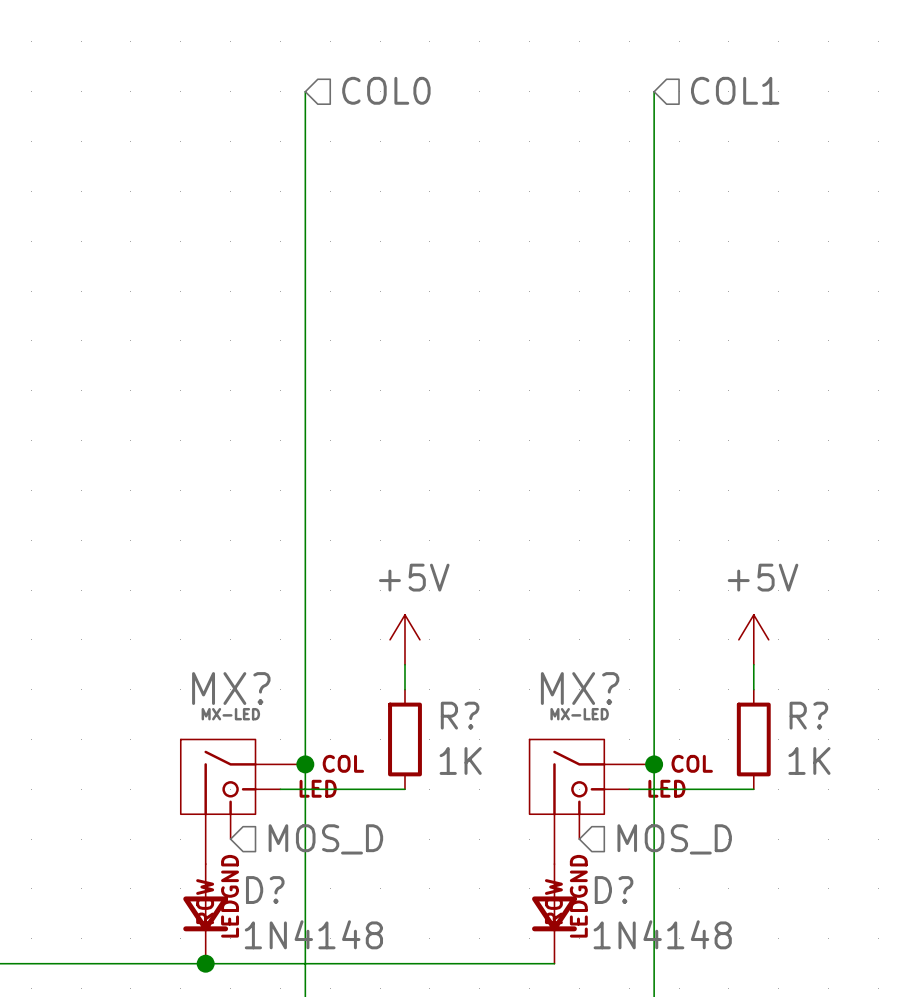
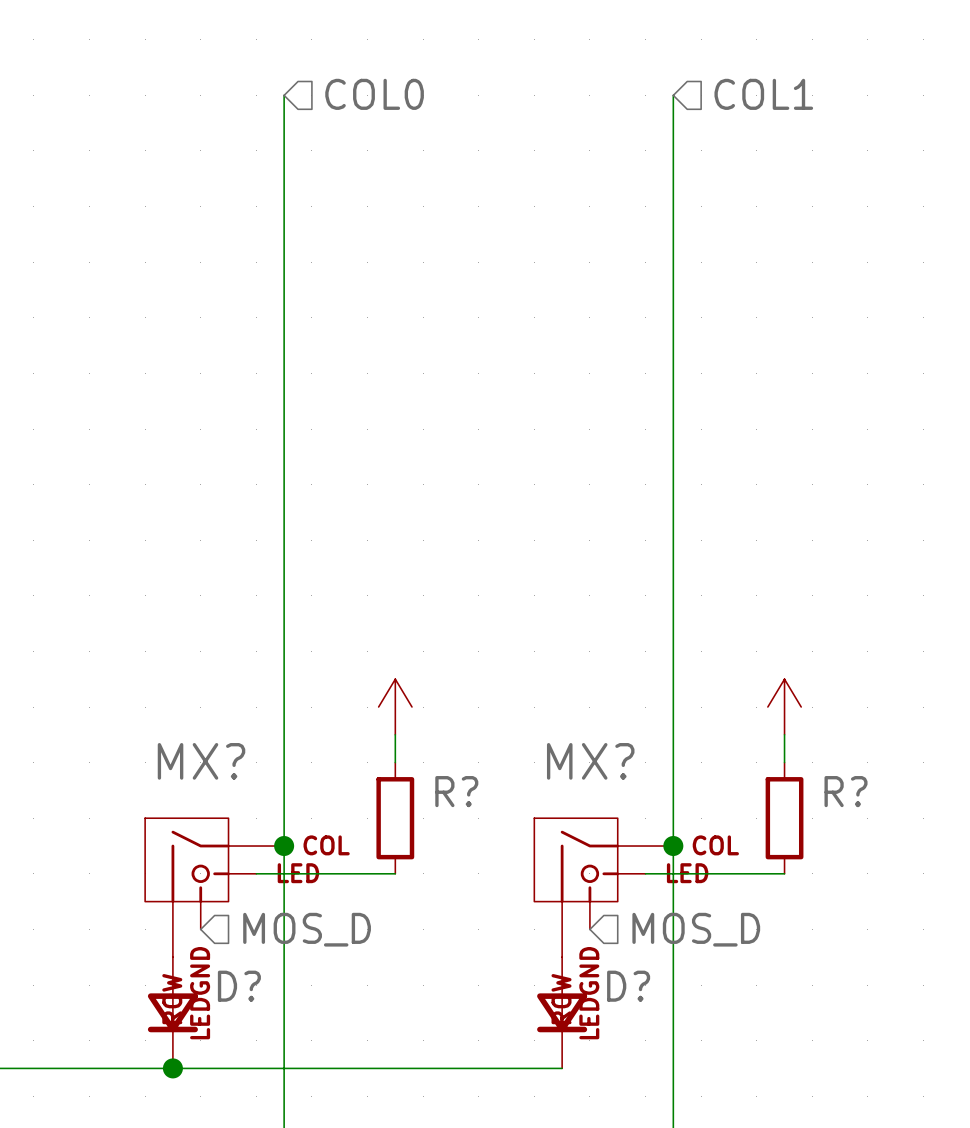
power symbol text: +5V (414, 577) -> none
power symbol text: +5V (763, 577) -> none
MX? value: MX-LED (230, 714) -> none
MX? value: MX-LED (579, 714) -> none
R? value: 1K (460, 760) -> none
R? value: 1K (809, 760) -> none
D? value: 1N4148 (313, 934) -> none
D? value: 1N4148 (662, 934) -> none

